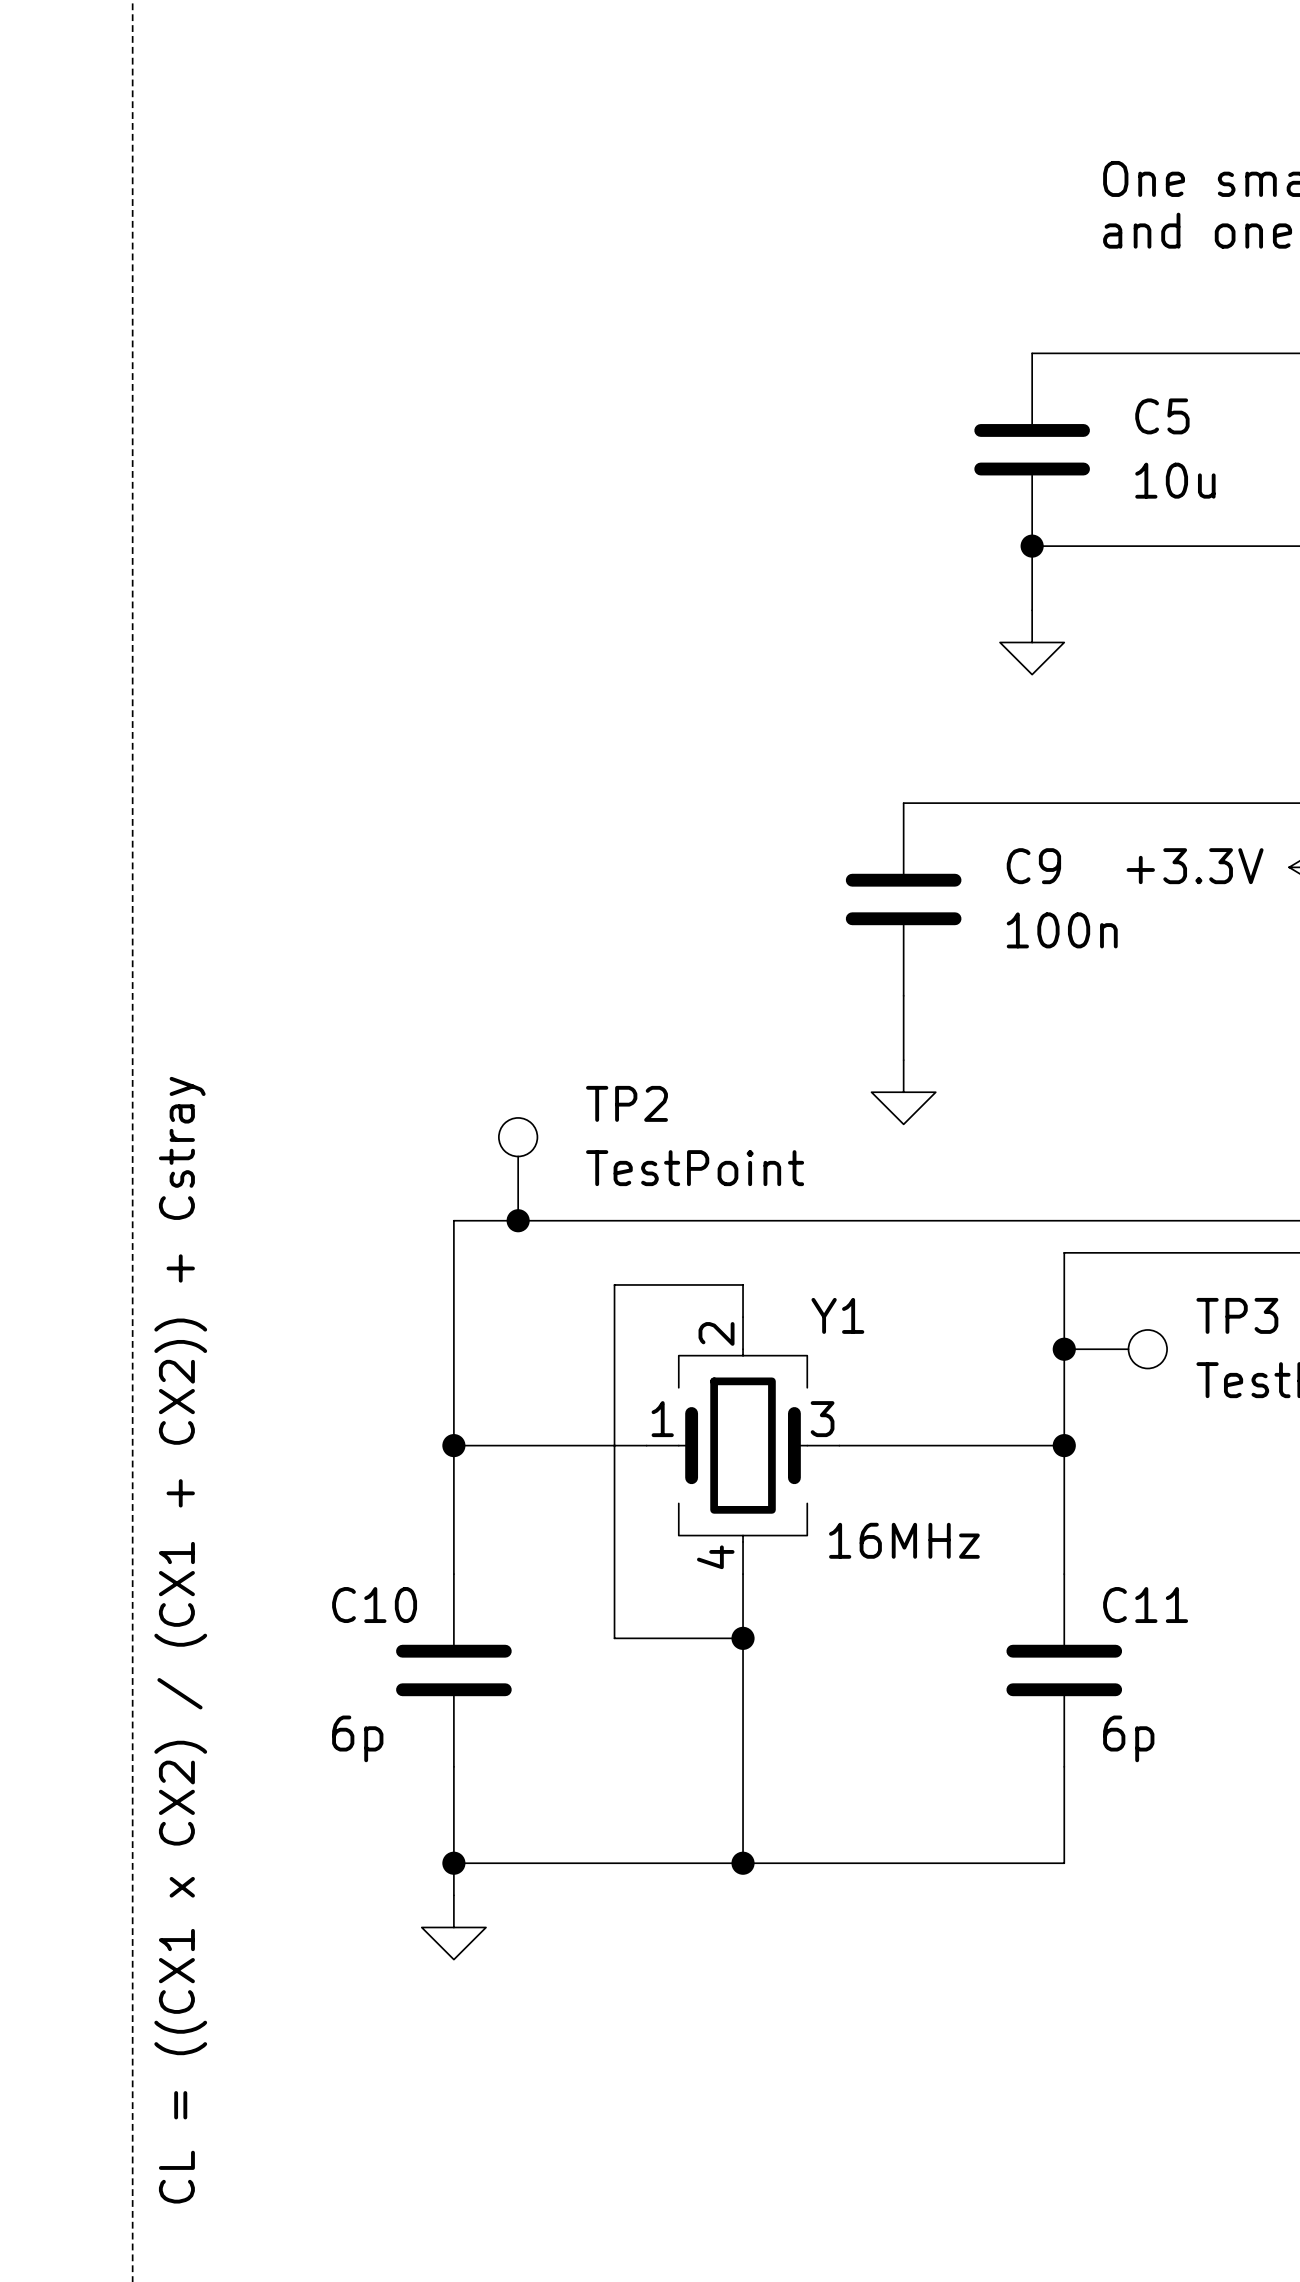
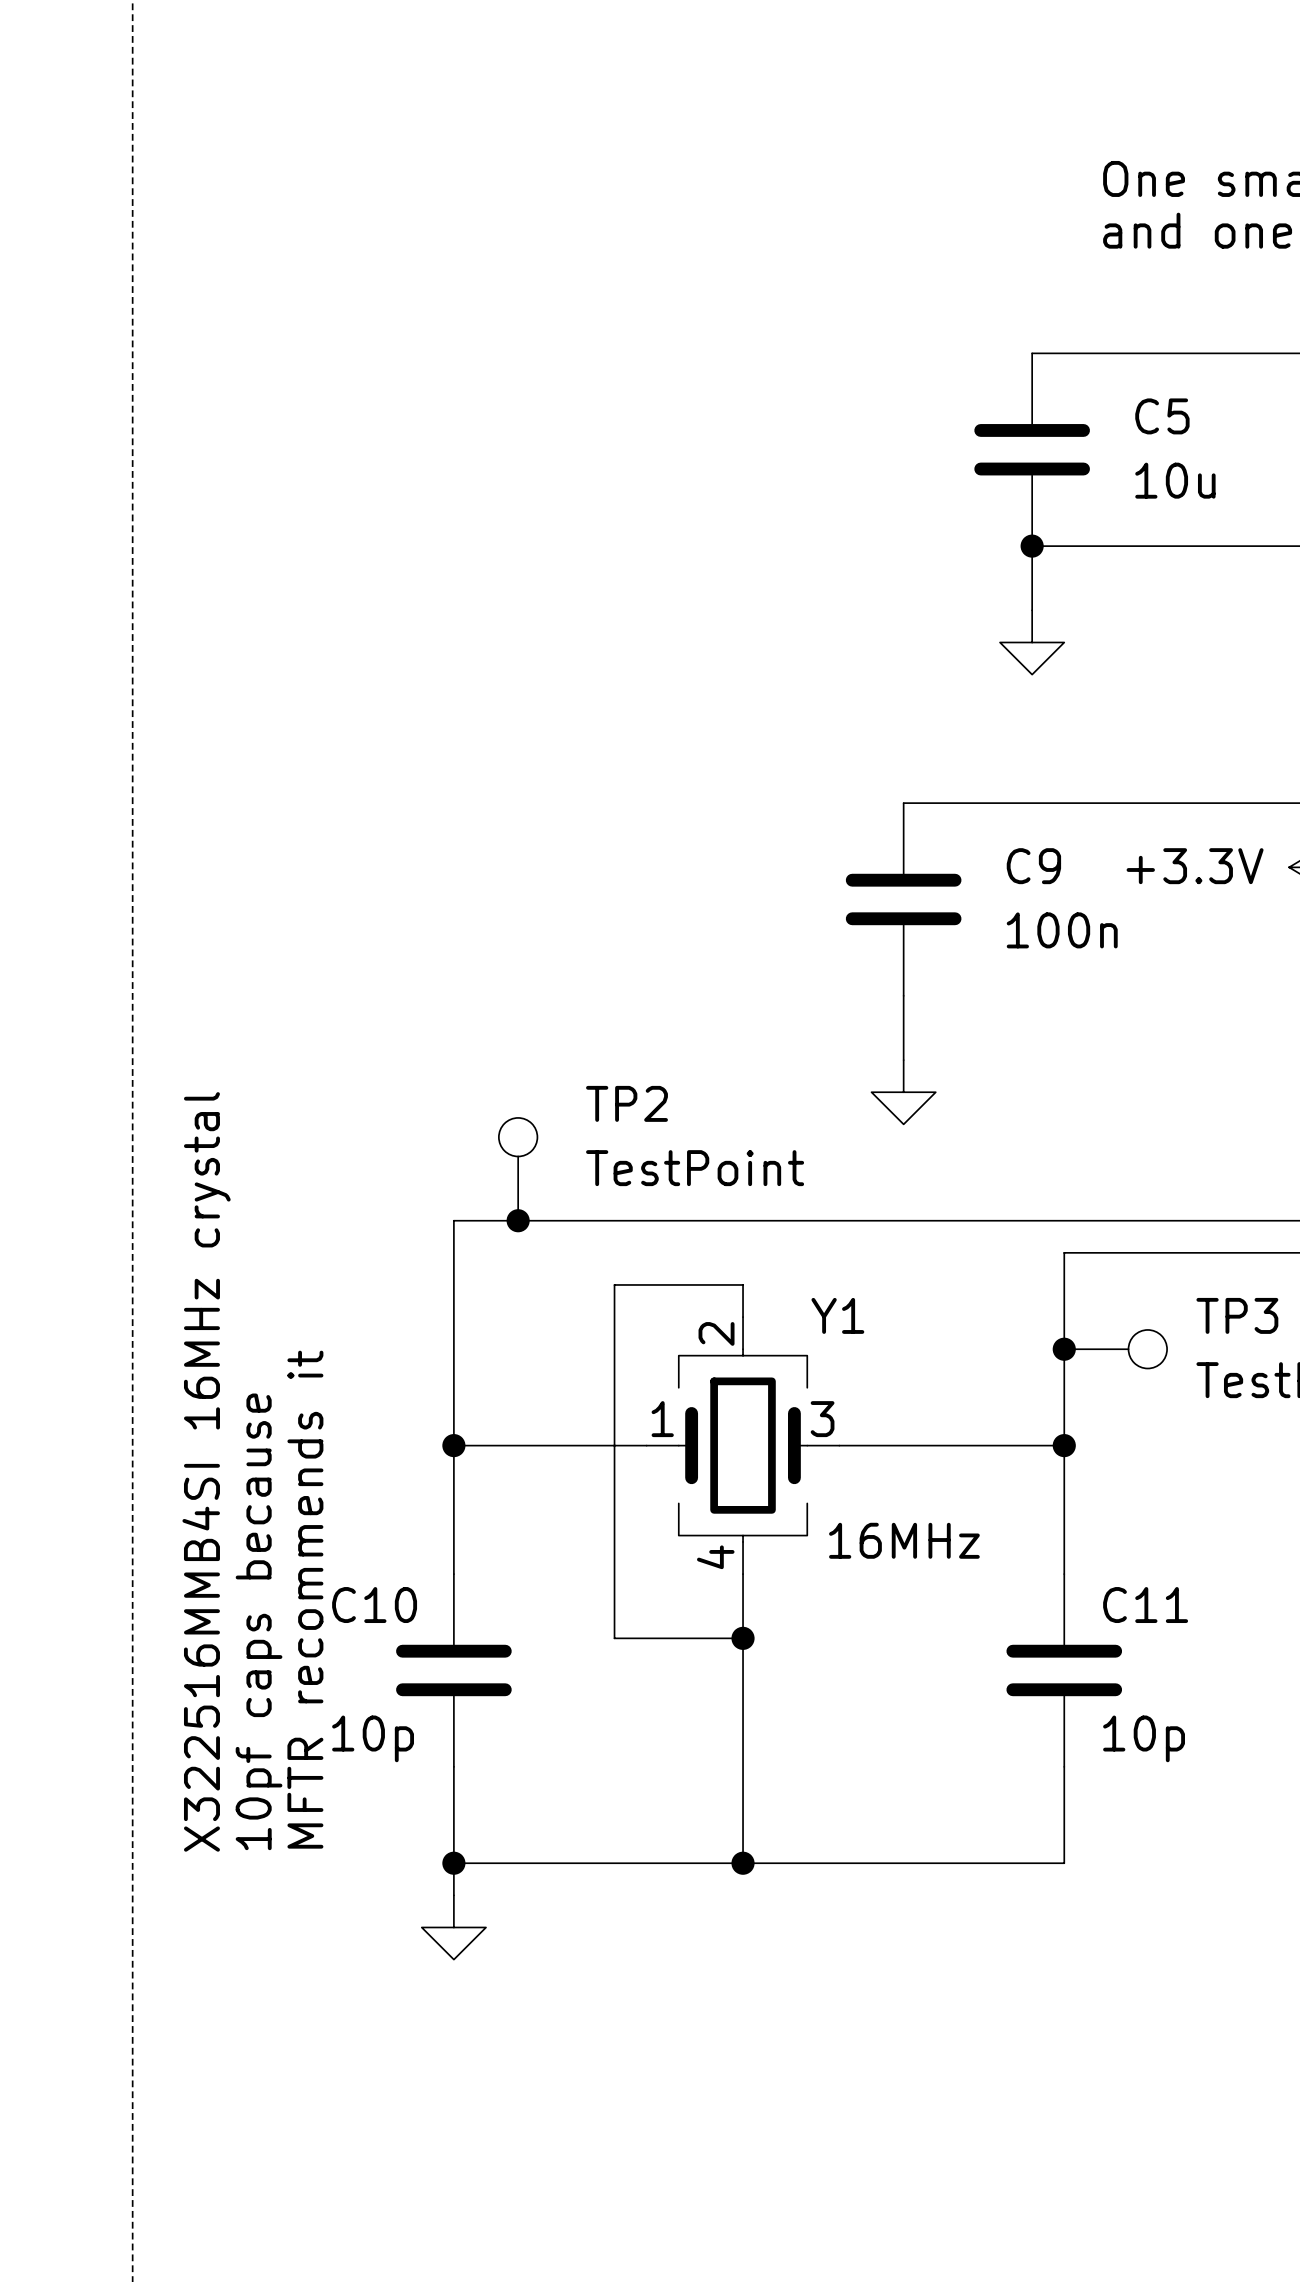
text: none -> X322516MMB4SI 16MHz crystal (206, 1471)
text: none -> MFTR recommends it (305, 1599)
text: none -> 10pf caps because (259, 1621)
text: CL = ((CX1 x CX2) / (CX1 + CX2)) + Cstray (180, 1640) -> none
C10 value: 6p (357, 1738) -> 10p (373, 1738)
C11 value: 6p (1128, 1738) -> 10p (1144, 1738)

